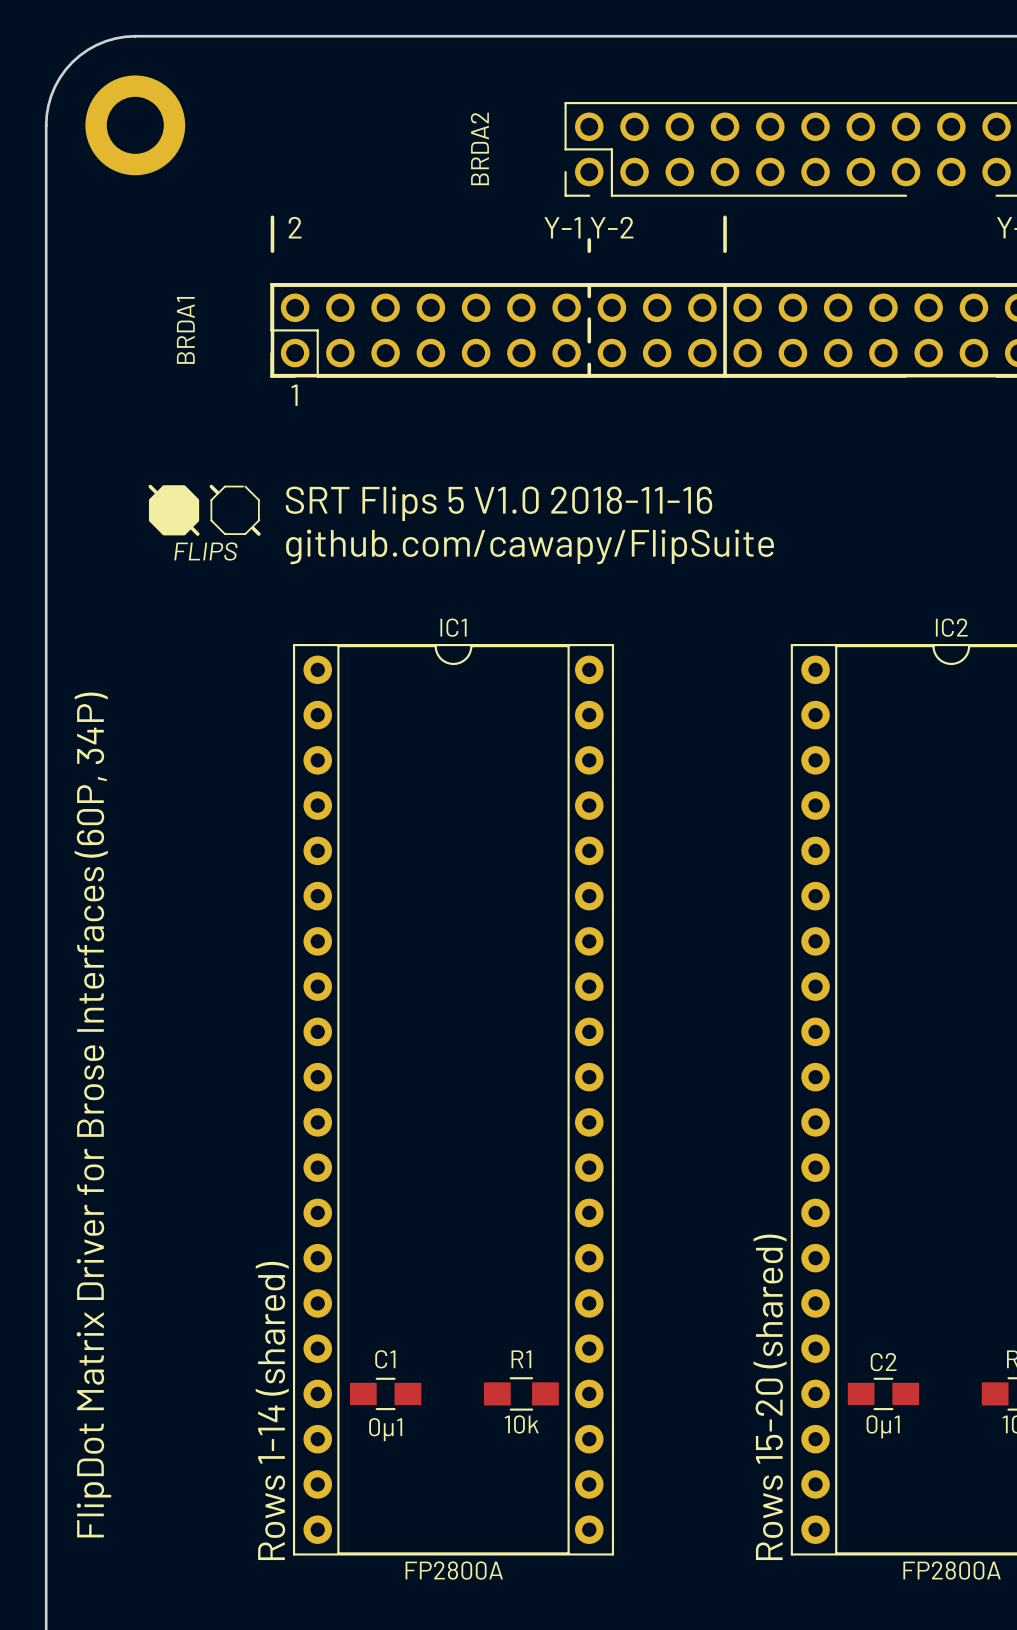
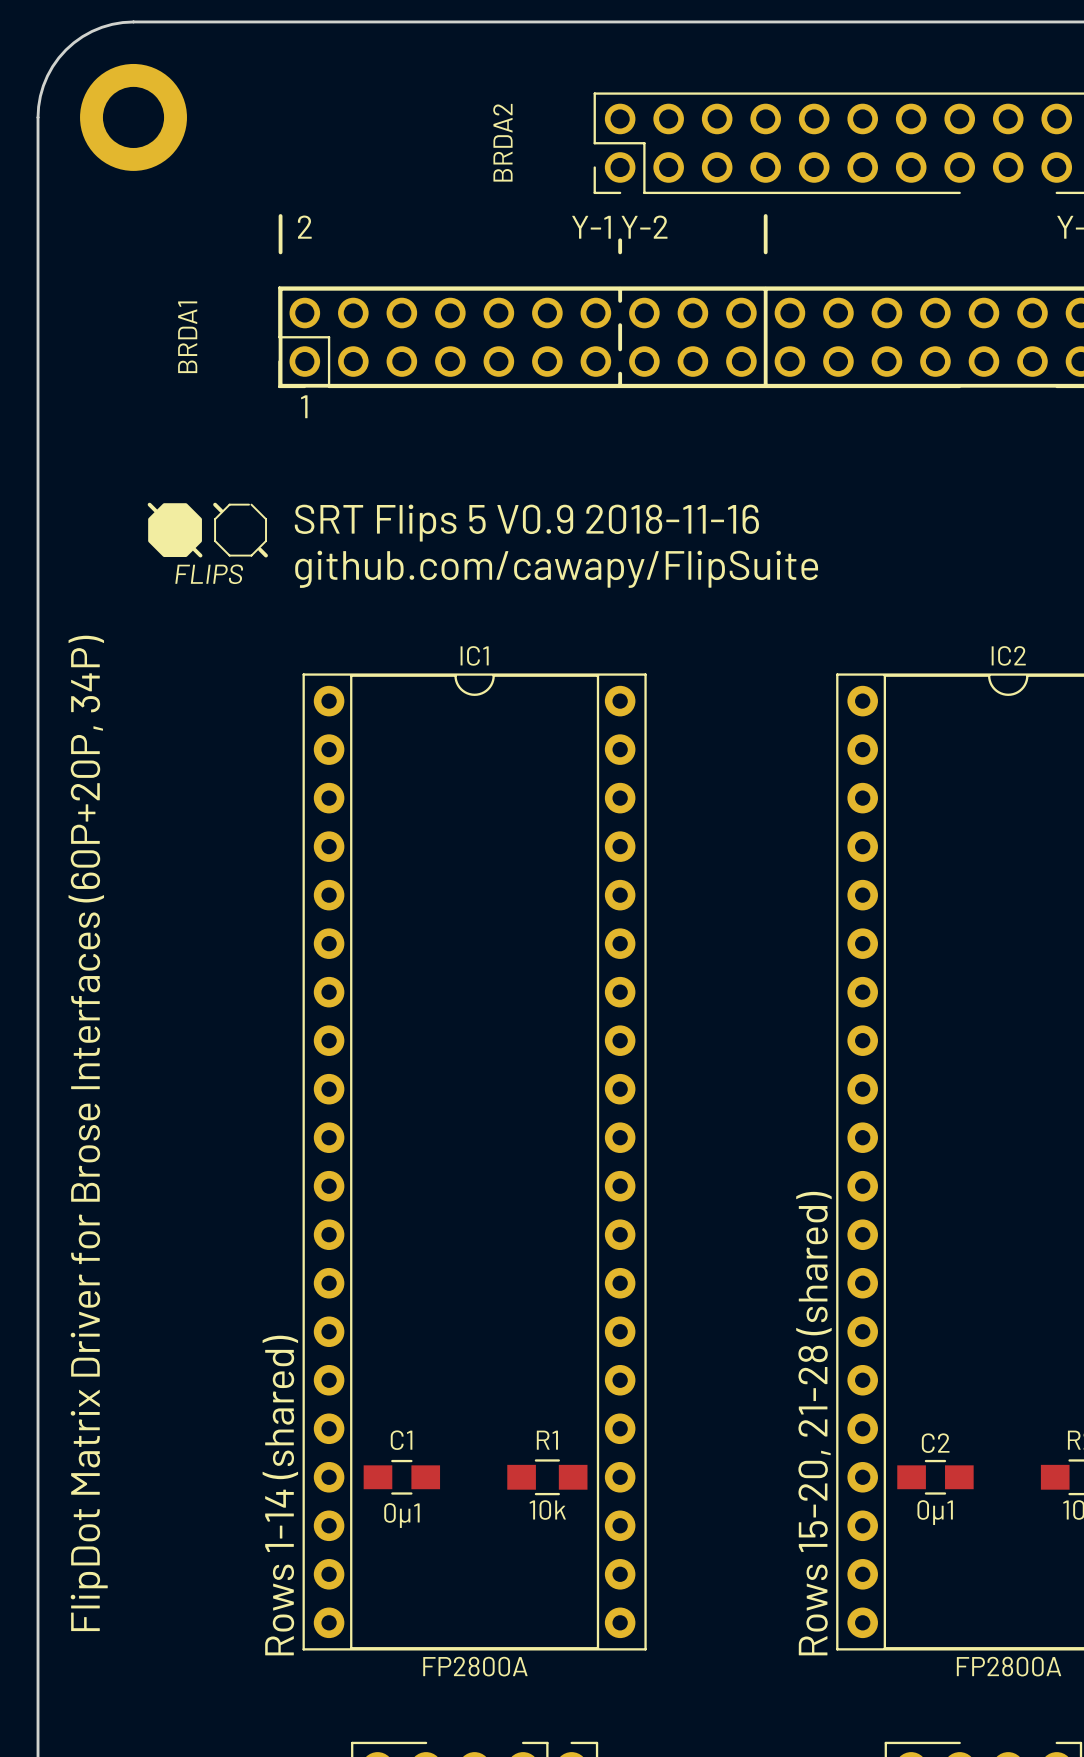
text: SRT Flips 5 V1.0 2018-11-16 (499, 503) -> SRT Flips 5 V0.9 2018-11-16 (526, 523)
text: FlipDot Matrix Driver for Brose Interfaces (60P, 34P) (92, 1115) -> FlipDot Matrix Driver for Brose Interfaces (60P+20P, 34P) (88, 1133)
text: Rows 15-20 (shared) (770, 1397) -> Rows 15-20, 21-28 (shared) (813, 1423)

